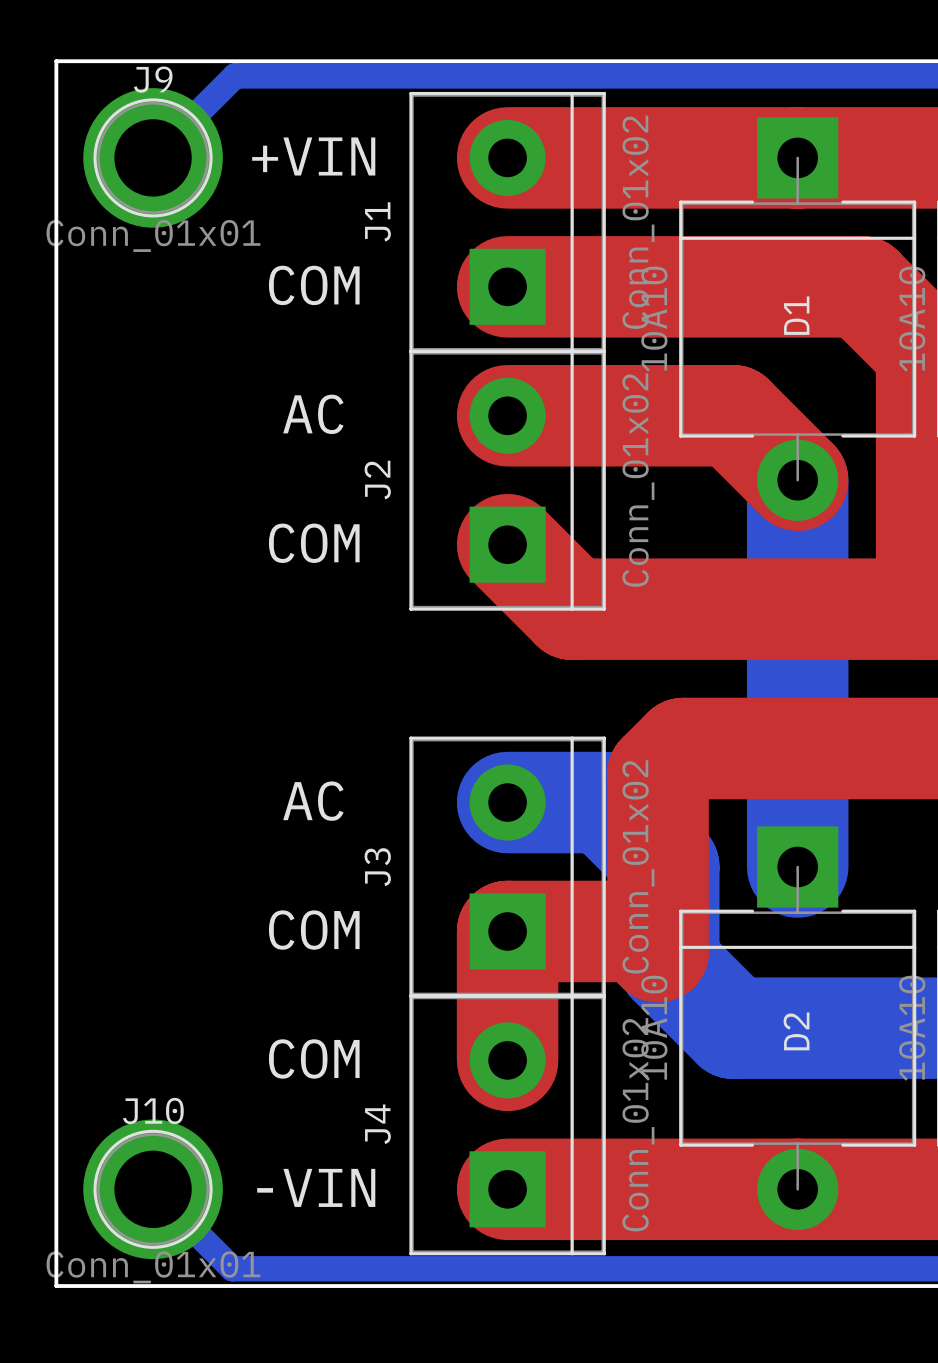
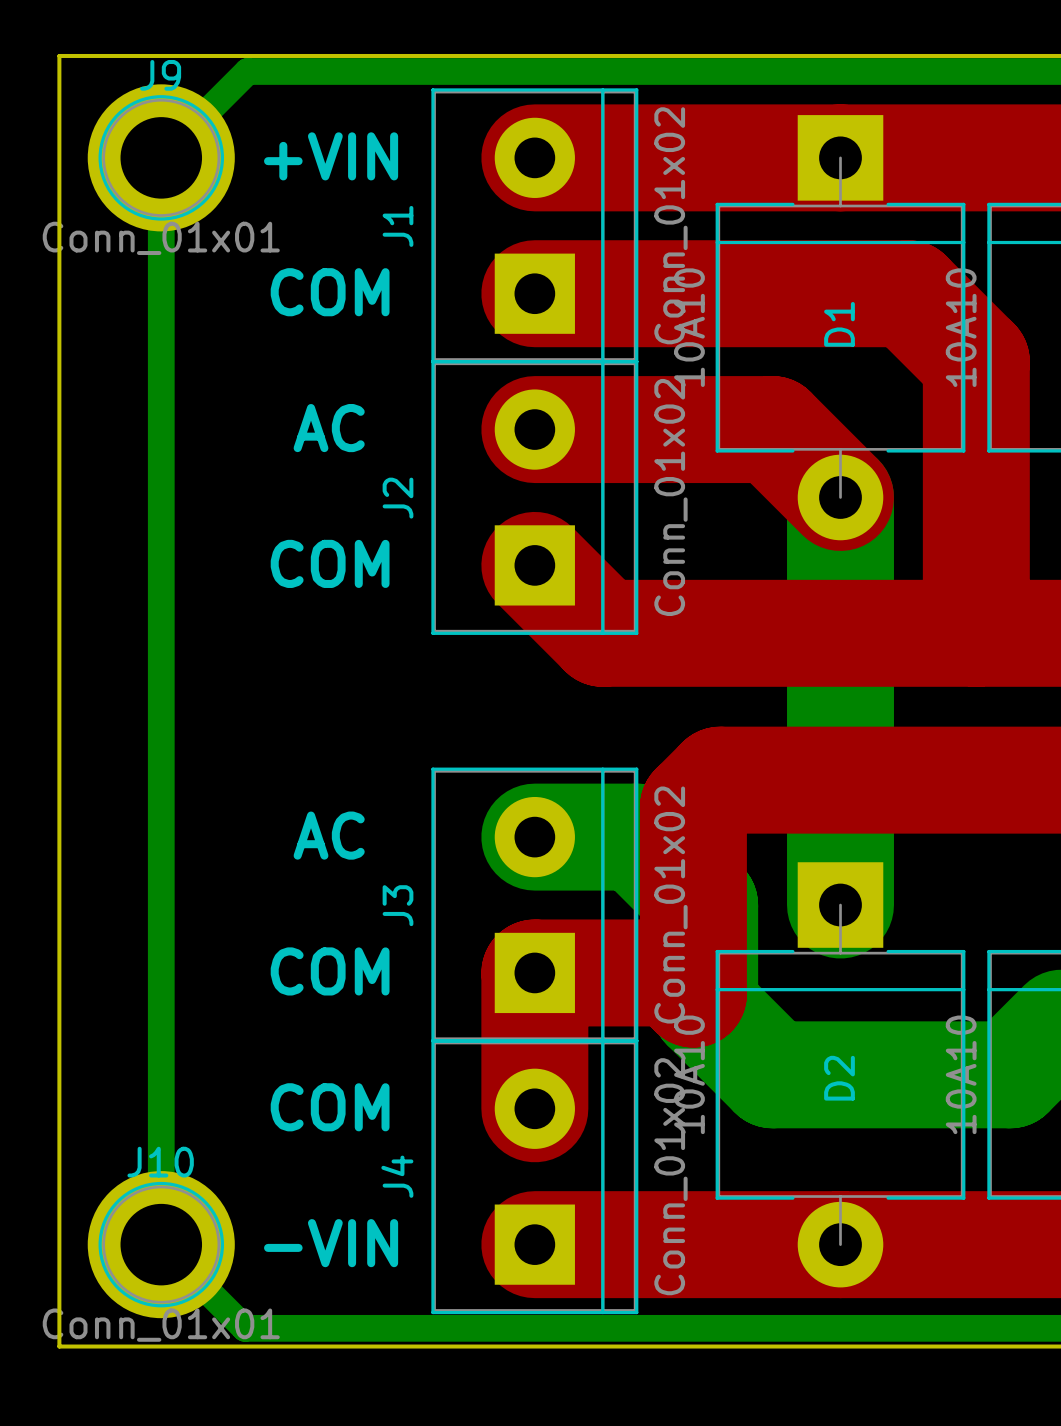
bottom track: none -> (161, 157) (161, 1244)

